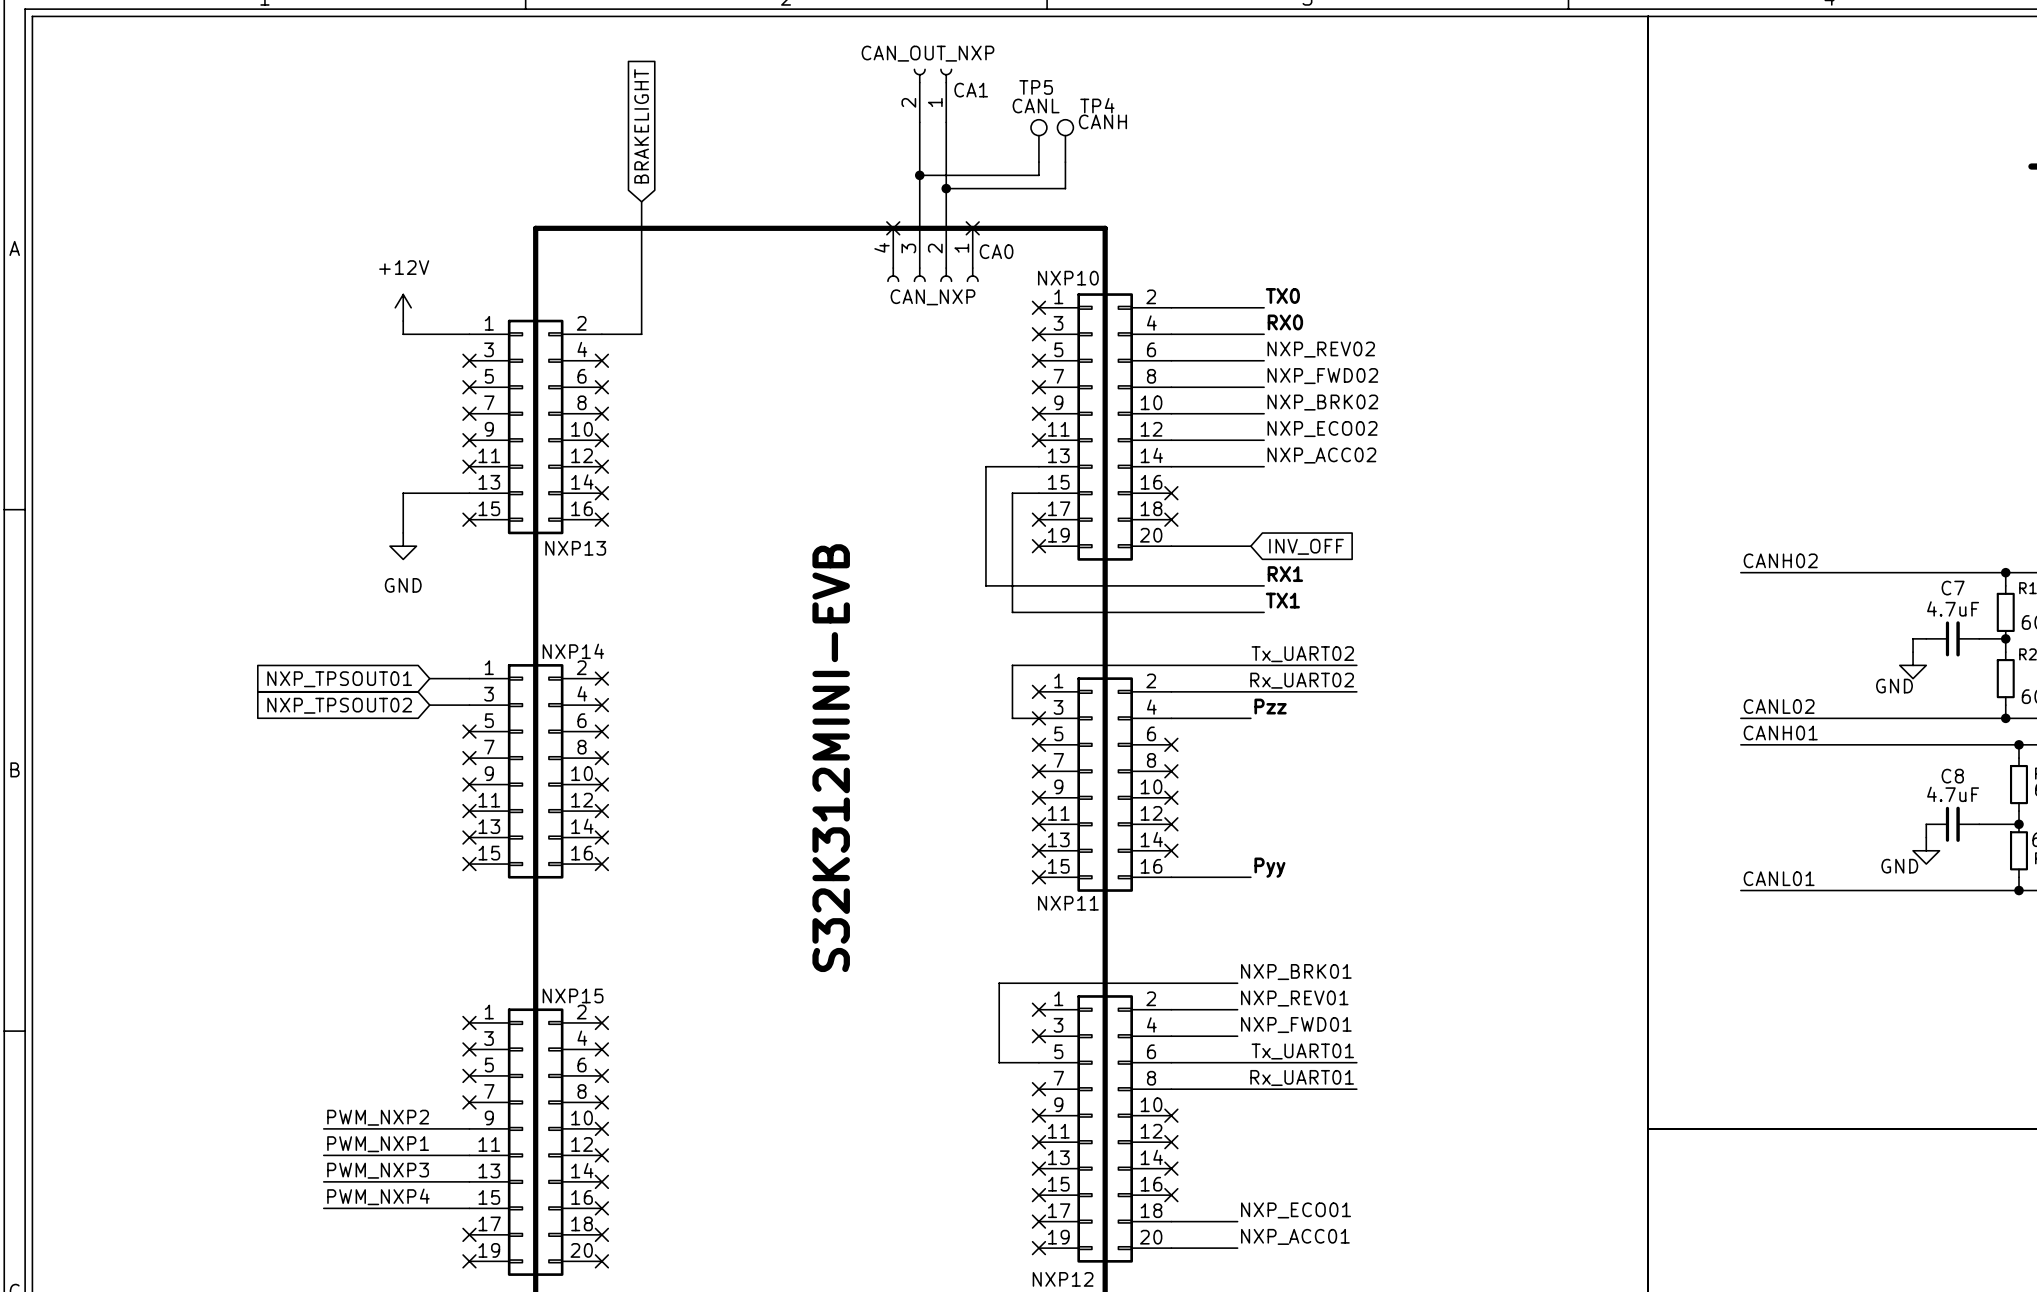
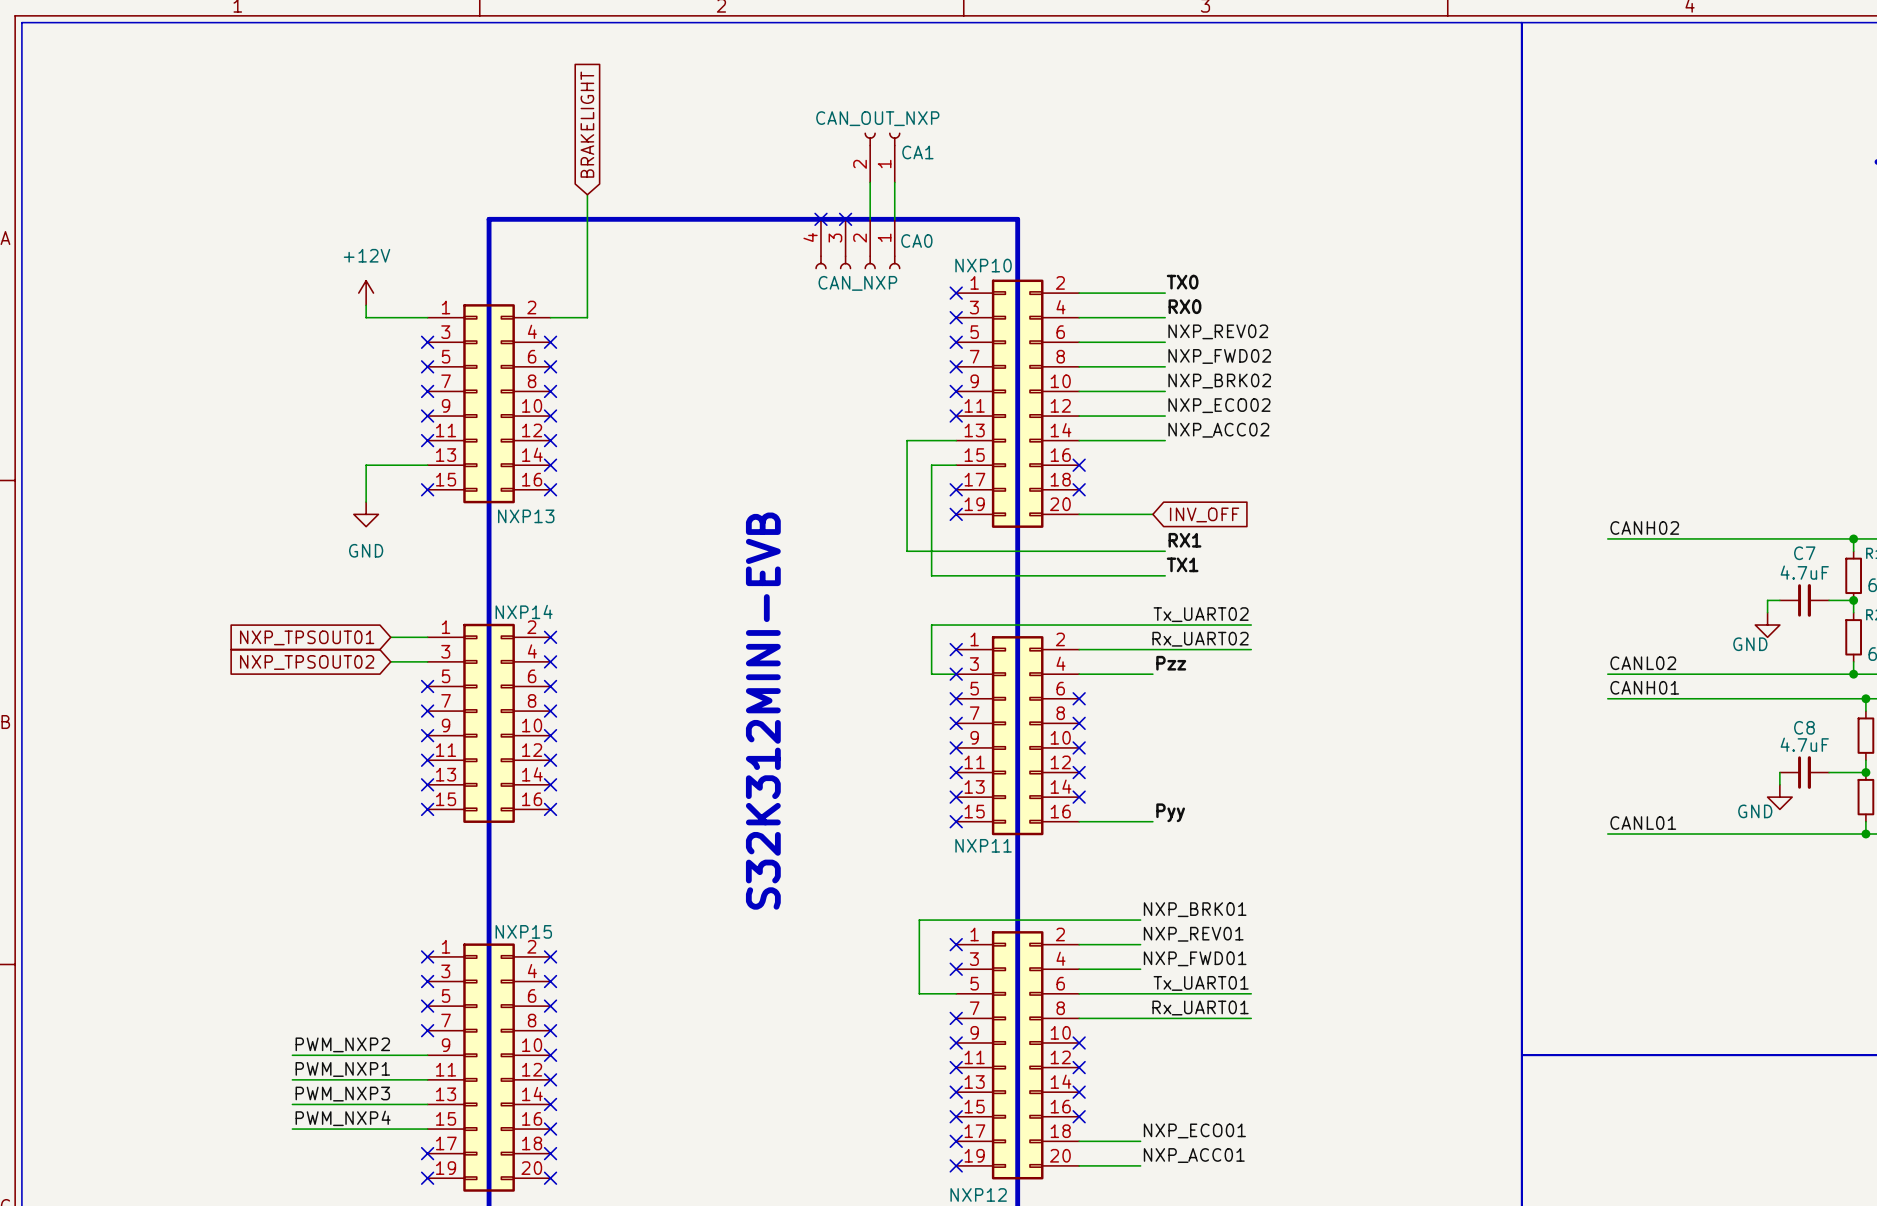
CA1 position: (932, 95) -> (882, 157)
wire: (919, 122) (919, 228) -> none
wire: (946, 122) (946, 188) (1065, 188) (1065, 162) -> none
TP5: CANL (1038, 140) -> none
TP4: CANH (1065, 140) -> none
wire: (1038, 162) (1038, 175) (919, 175) -> none
junction: (919, 175) -> none
junction: (946, 188) -> none
wire: none -> (894, 182) (894, 219)
no-connect mark position: (972, 228) -> (845, 219)

